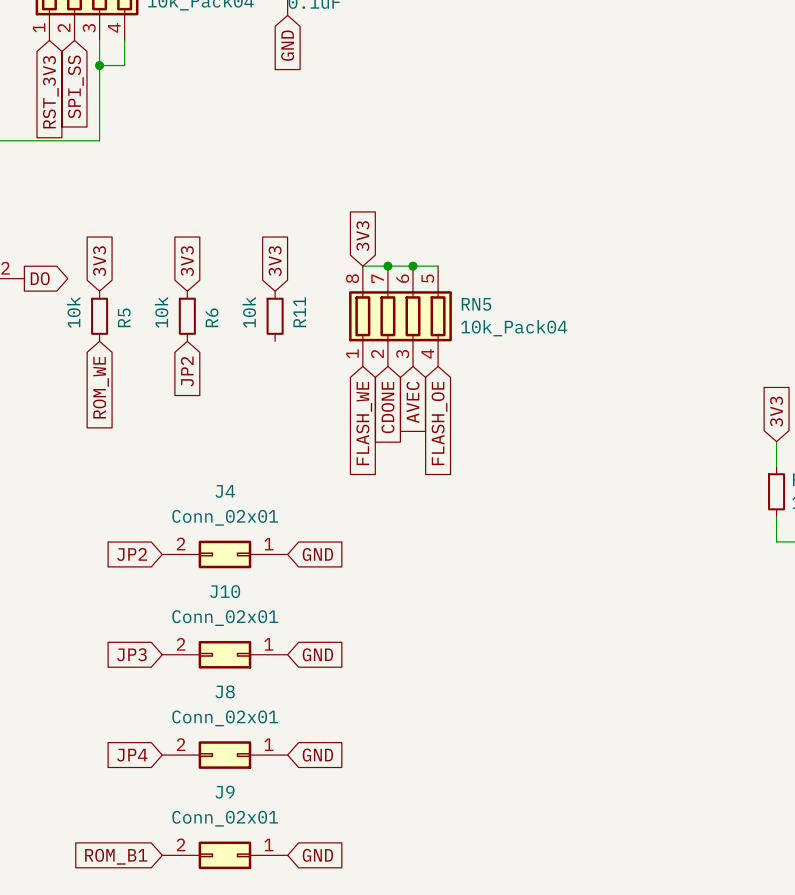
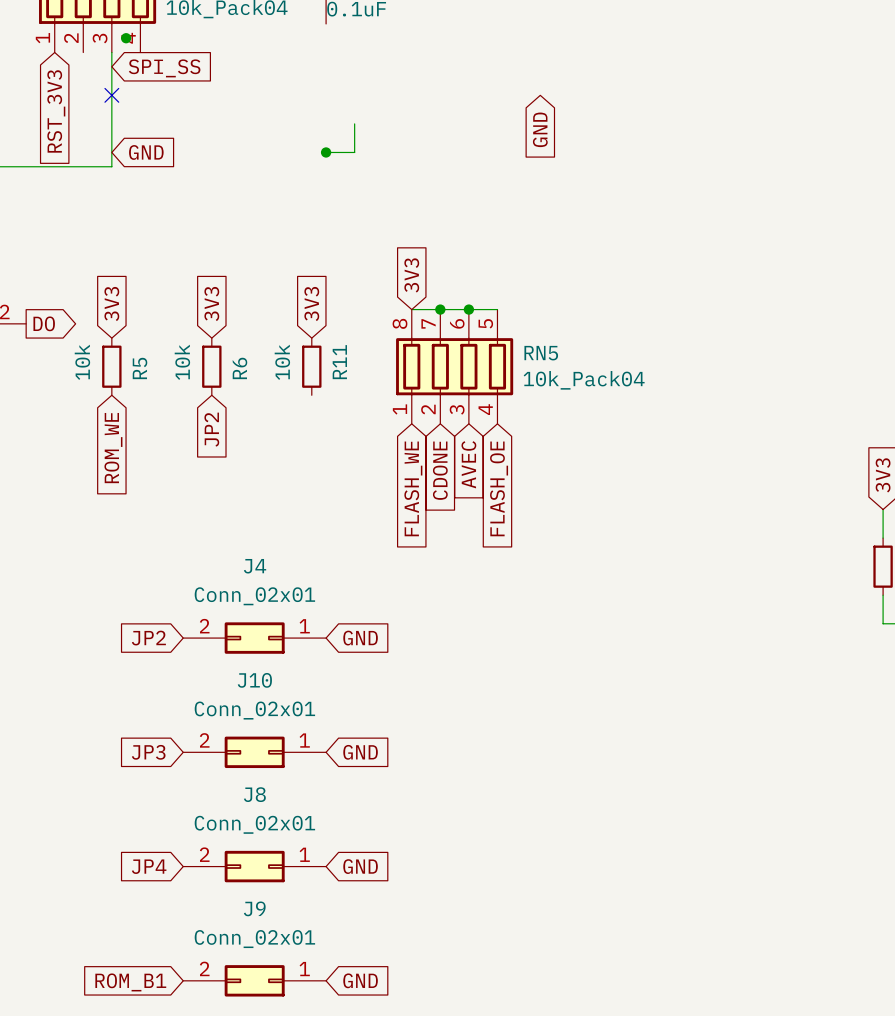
wire: (124, 40) (124, 65) (99, 65) -> (354, 123) (354, 152) (326, 152)
global label: GND (287, 45) -> none
junction position: (99, 65) -> (126, 38)
no-connect mark: none -> (111, 95)
global label rotation: 0° (75, 87) -> 90° counterclockwise (164, 68)
global label: none -> GND (540, 129)
global label: none -> GND (146, 152)
junction: none -> (326, 152)

